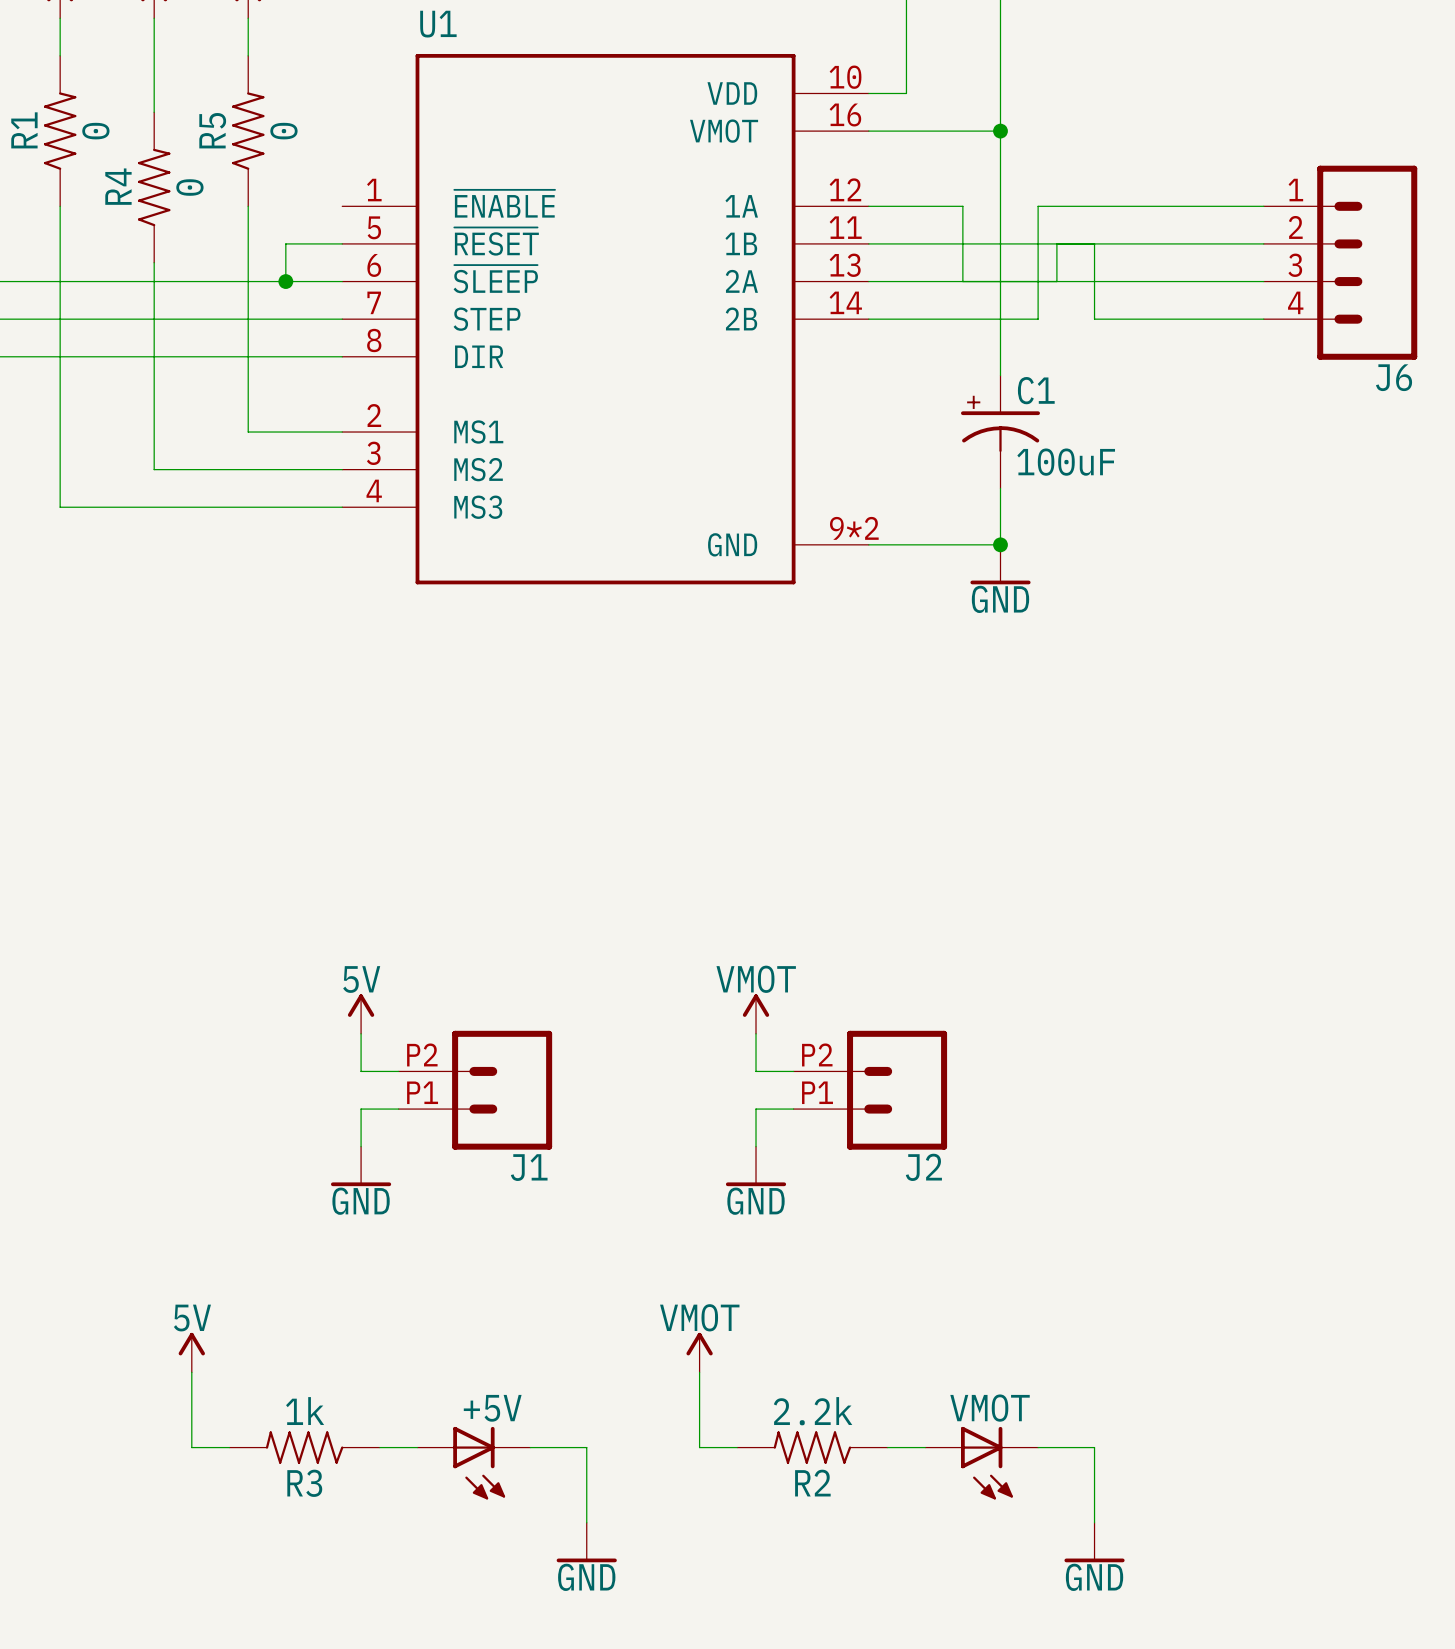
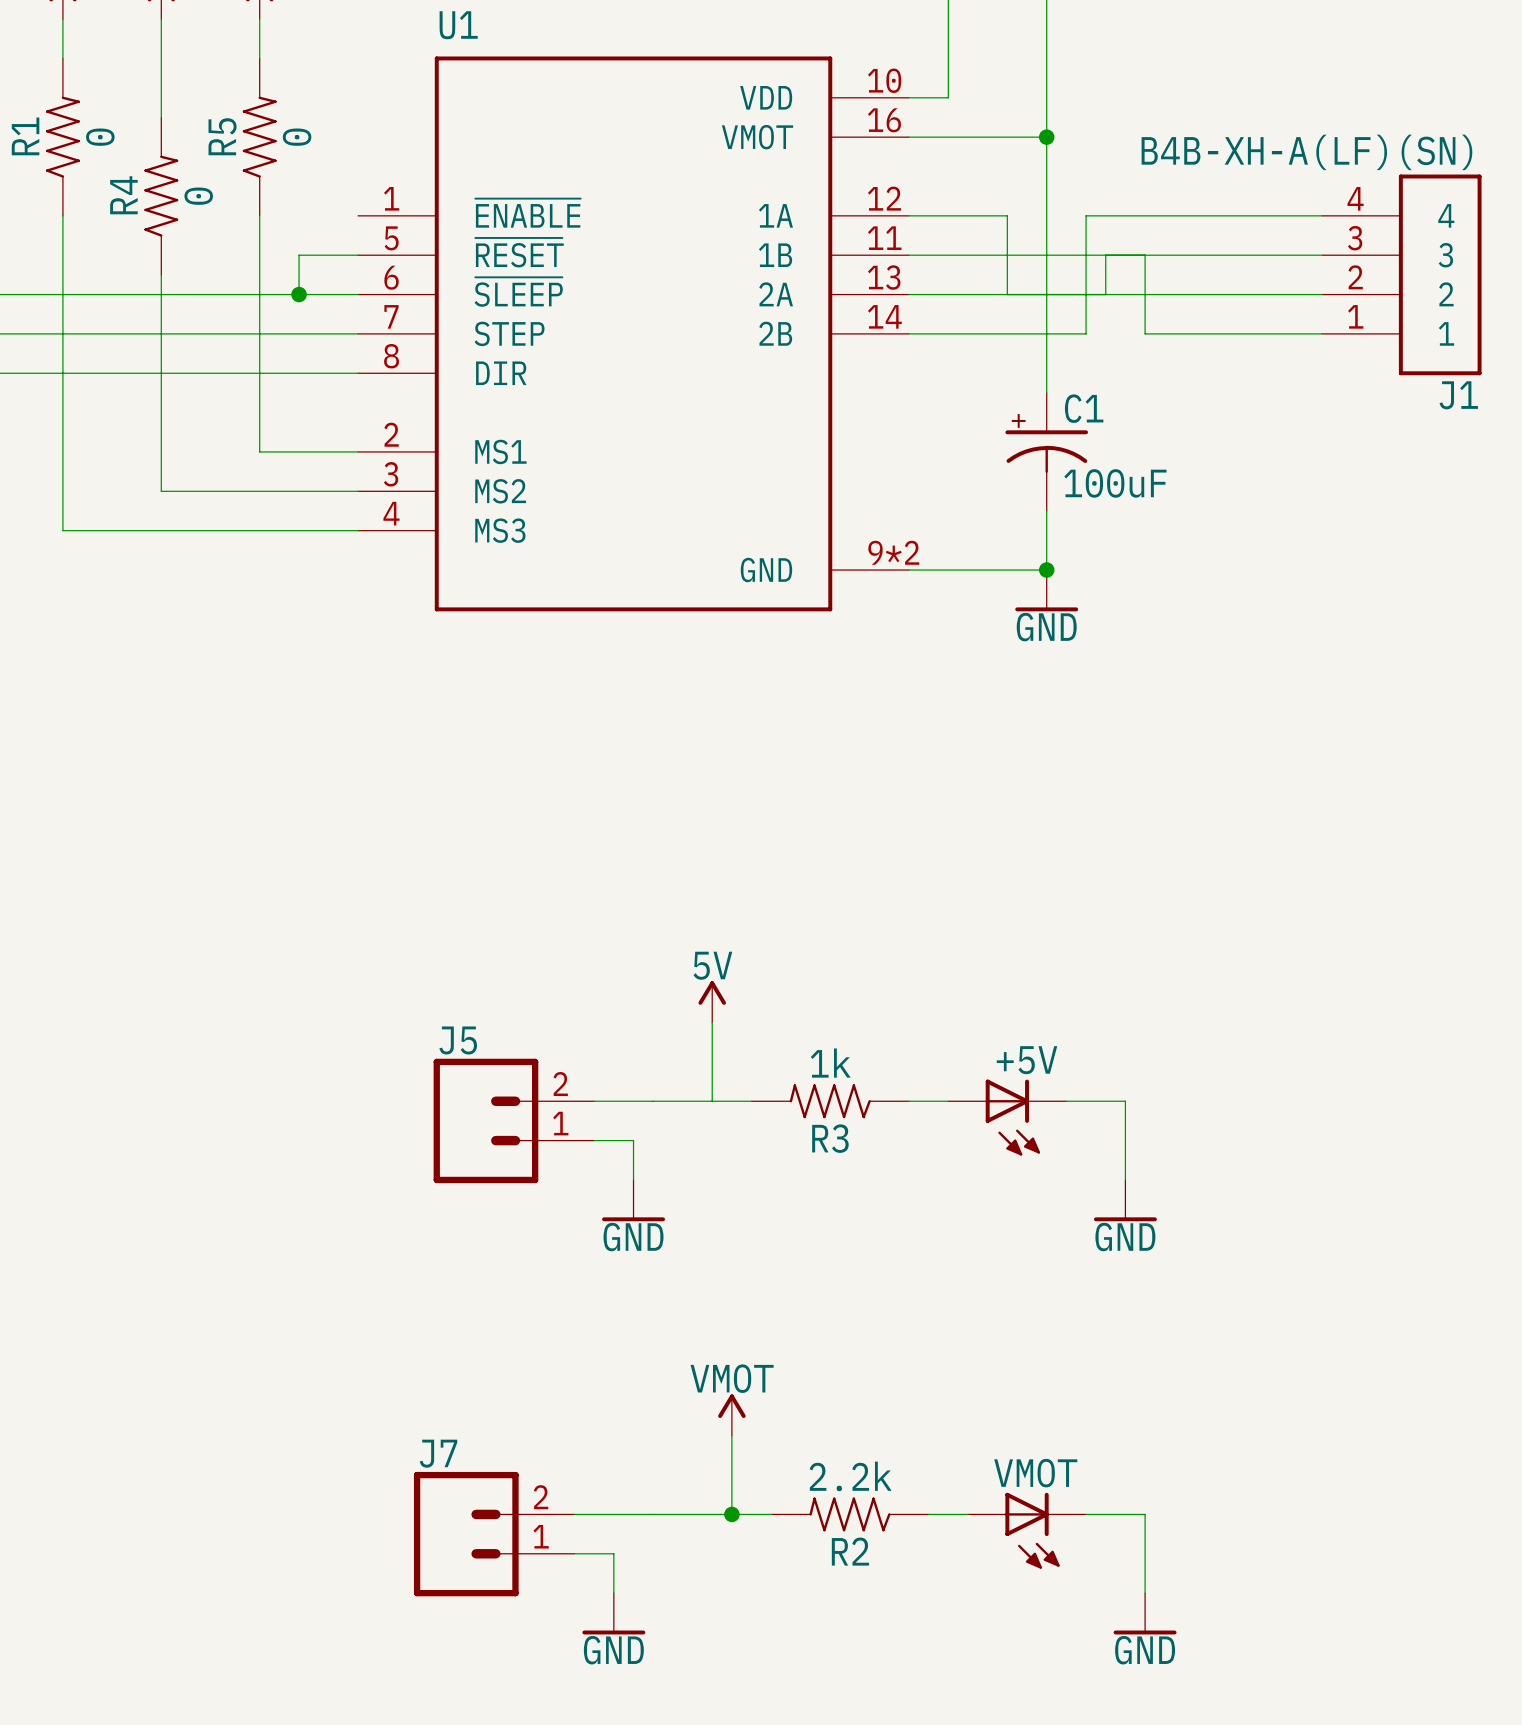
J1 value: none -> B4B-XH-A(LF)(SN) (1306, 152)
J6: (1340, 262) -> none
power symbol: none -> 5V (712, 1001)
wire: none -> (712, 1022) (712, 1101)
power symbol: 5V (361, 1014) -> none
power symbol: VMOT (756, 1014) -> none
J1 symbol: [398, 1030, 553, 1150] -> [1322, 174, 1482, 376]
wire: (361, 1033) (361, 1071) (398, 1071) -> none
wire: (756, 1033) (756, 1071) (793, 1071) -> none
wire: none -> (594, 1101) (751, 1101)
wire: none -> (908, 1101) (948, 1101)
wire: none -> (1066, 1101) (1125, 1101) (1125, 1179)
J5: none -> (513, 1120)
wire: none -> (594, 1140) (633, 1140) (633, 1179)
J2: (870, 1090) -> none
wire: (398, 1109) (361, 1109) (361, 1146) -> none
wire: (793, 1109) (756, 1109) (756, 1146) -> none
power symbol: none -> GND (633, 1200)
power symbol: none -> GND (1125, 1200)
power symbol: GND (361, 1166) -> none
power symbol: GND (756, 1166) -> none
J1 name position: J1 (529, 1167) -> J1 (1458, 395)
power symbol: 5V (191, 1352) -> none
wire: (191, 1372) (191, 1447) (229, 1447) -> none
R3 position: (304, 1447) -> (830, 1101)
wire: (379, 1447) (417, 1447) -> none
wire: (586, 1447) (586, 1485) -> (574, 1553) (613, 1553)
wire: none -> (613, 1514) (731, 1514)
junction: none -> (731, 1514)
+5V position: (473, 1463) -> (1007, 1117)
J7: none -> (494, 1534)

